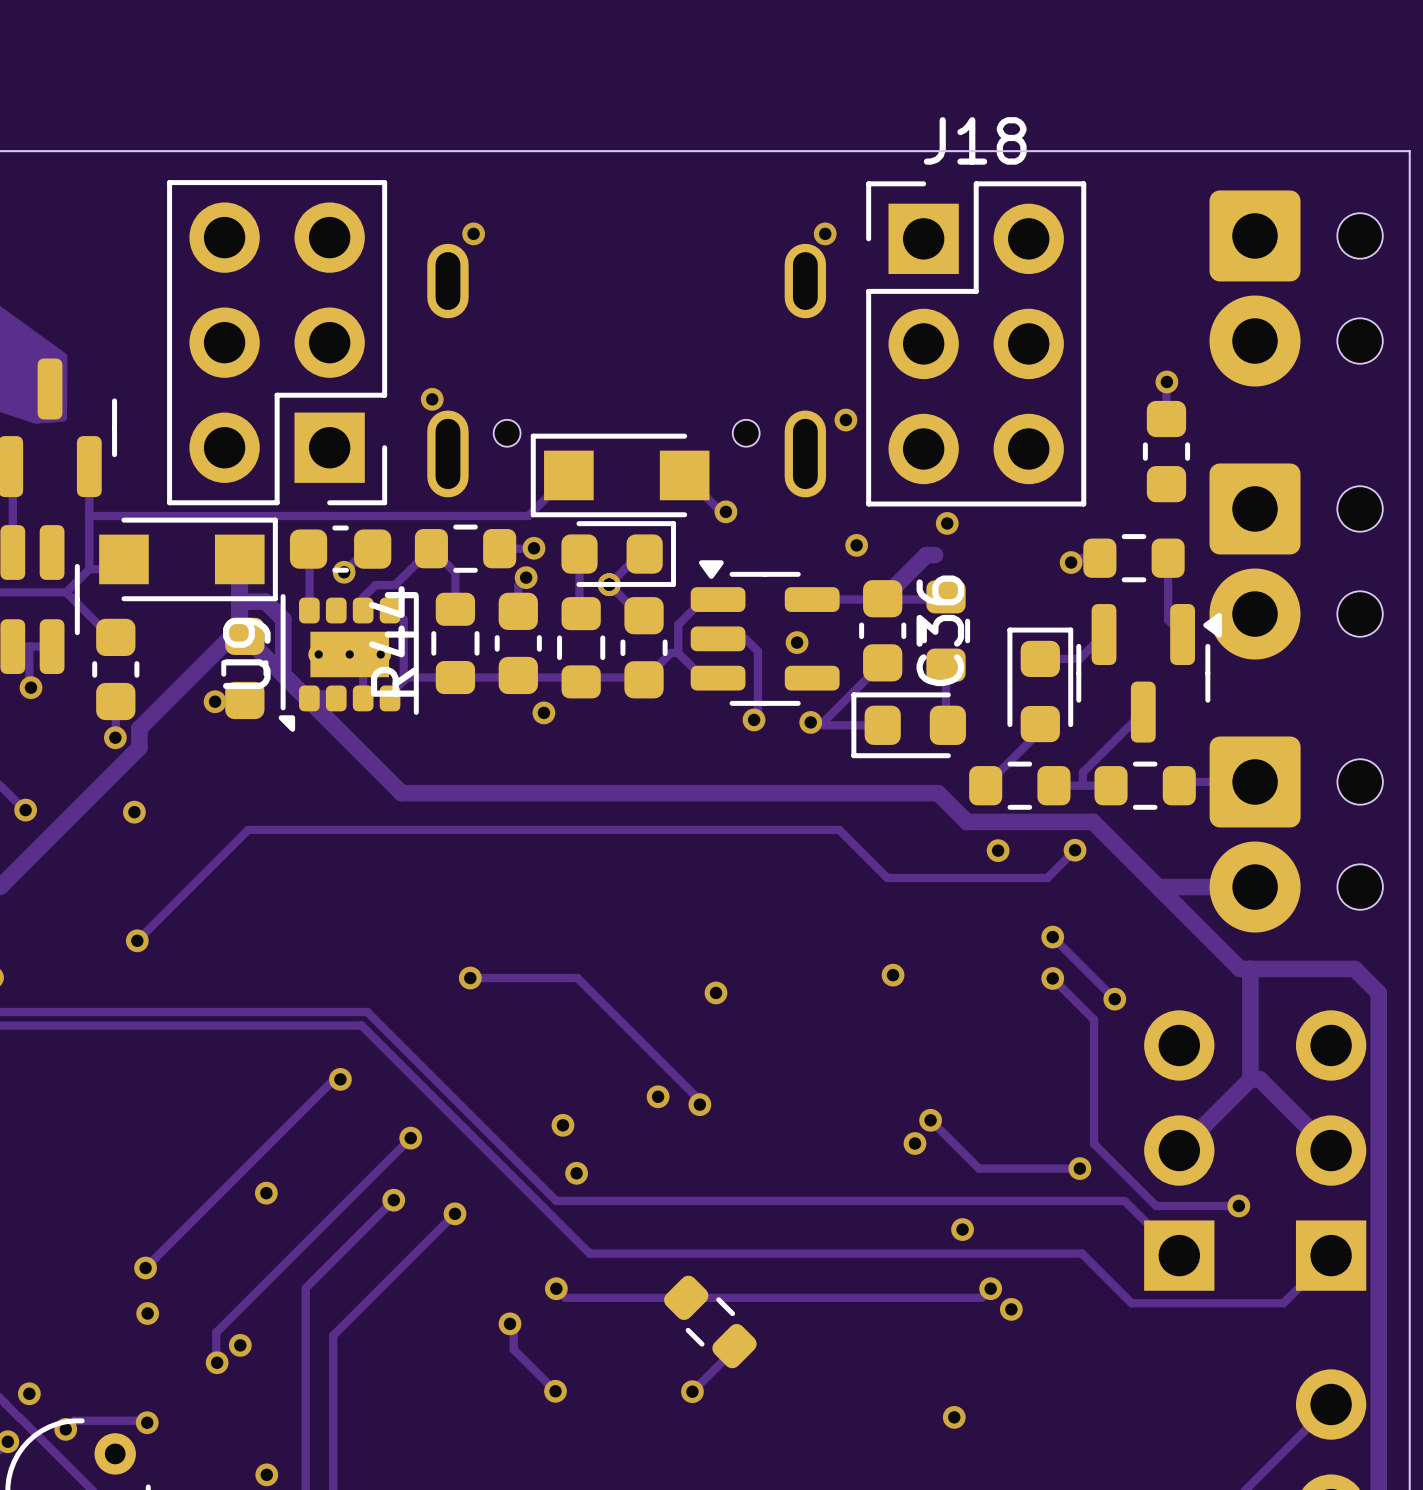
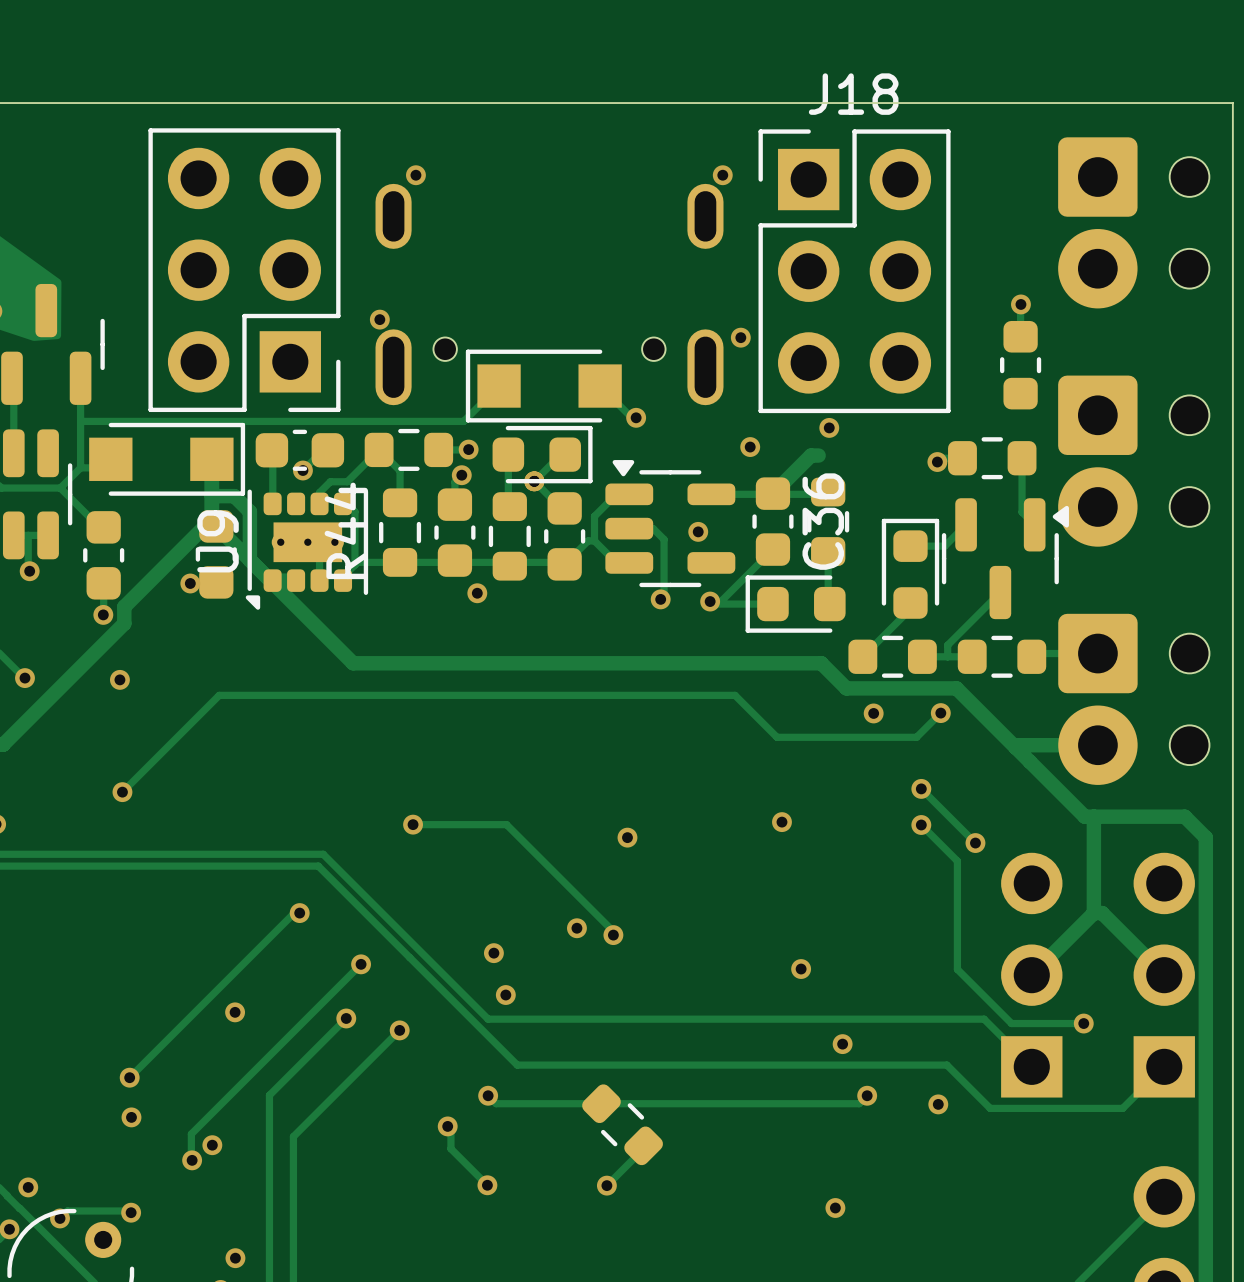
track: (930, 1120) (978, 1168) (1079, 1168) -> none
via: (930, 1120) -> none
via: (1079, 1168) -> none
via position: (1011, 1309) -> (938, 1104)

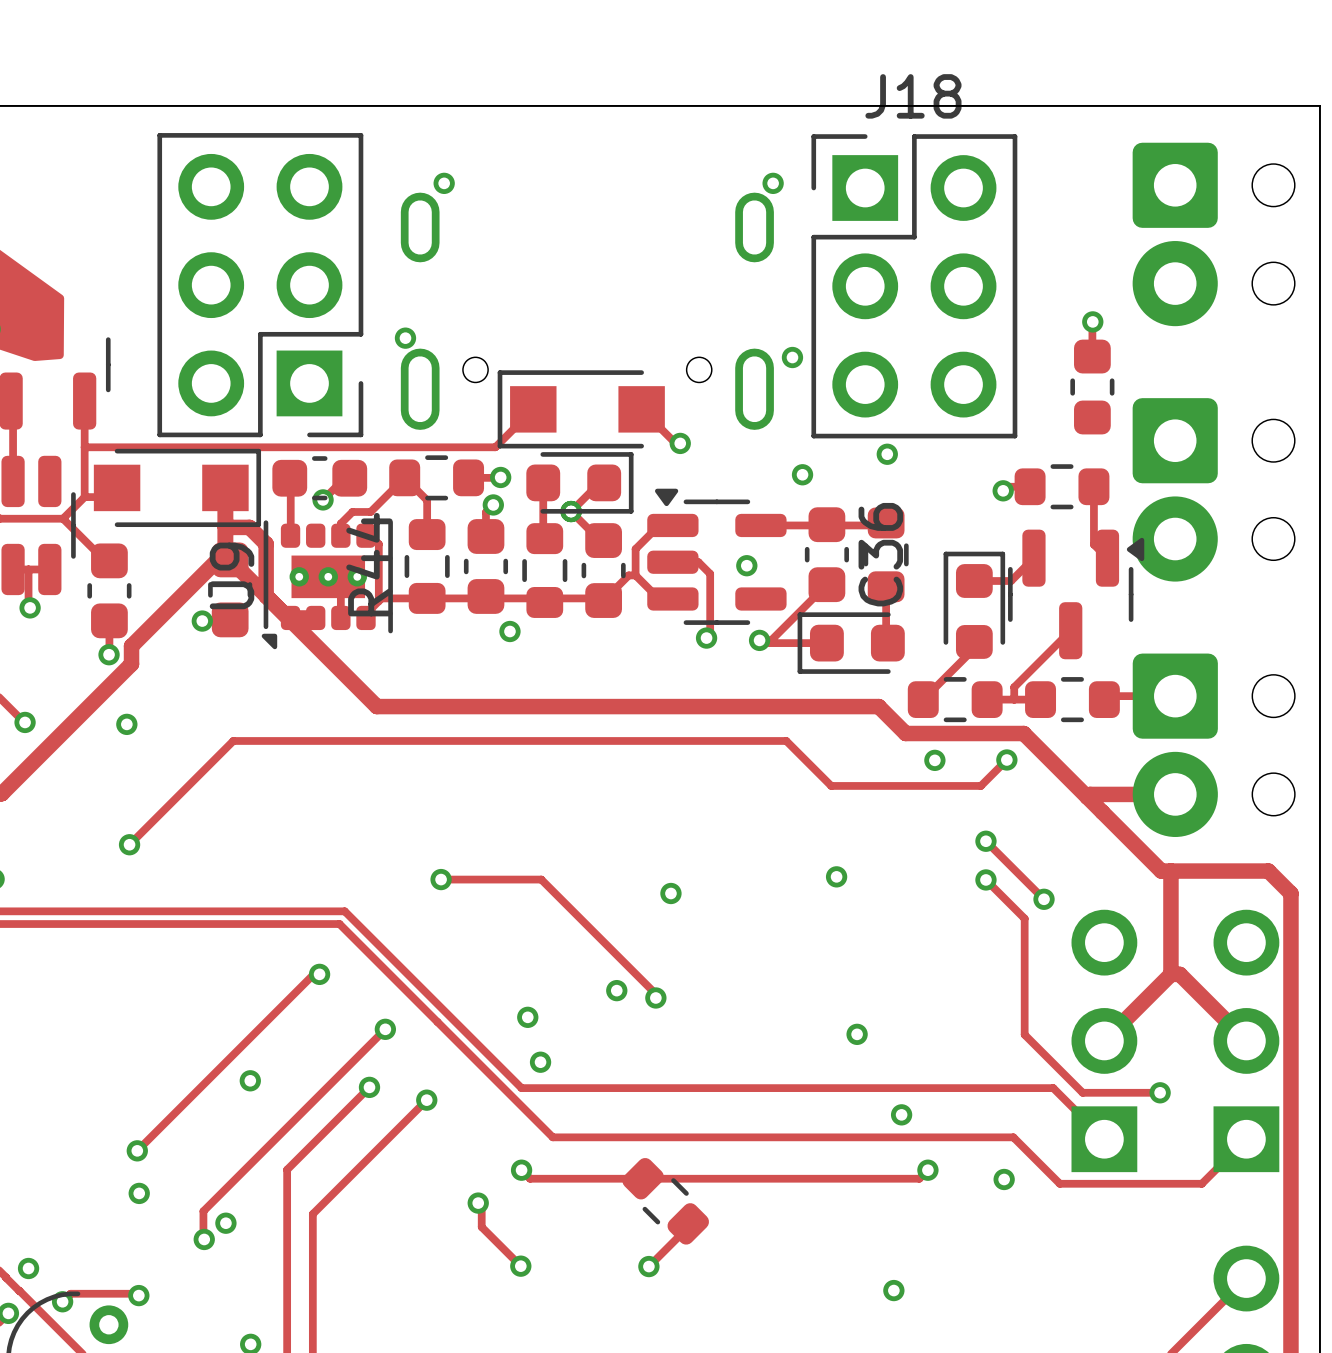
track: (818, 455) (811, 455) (772, 493) -> none

